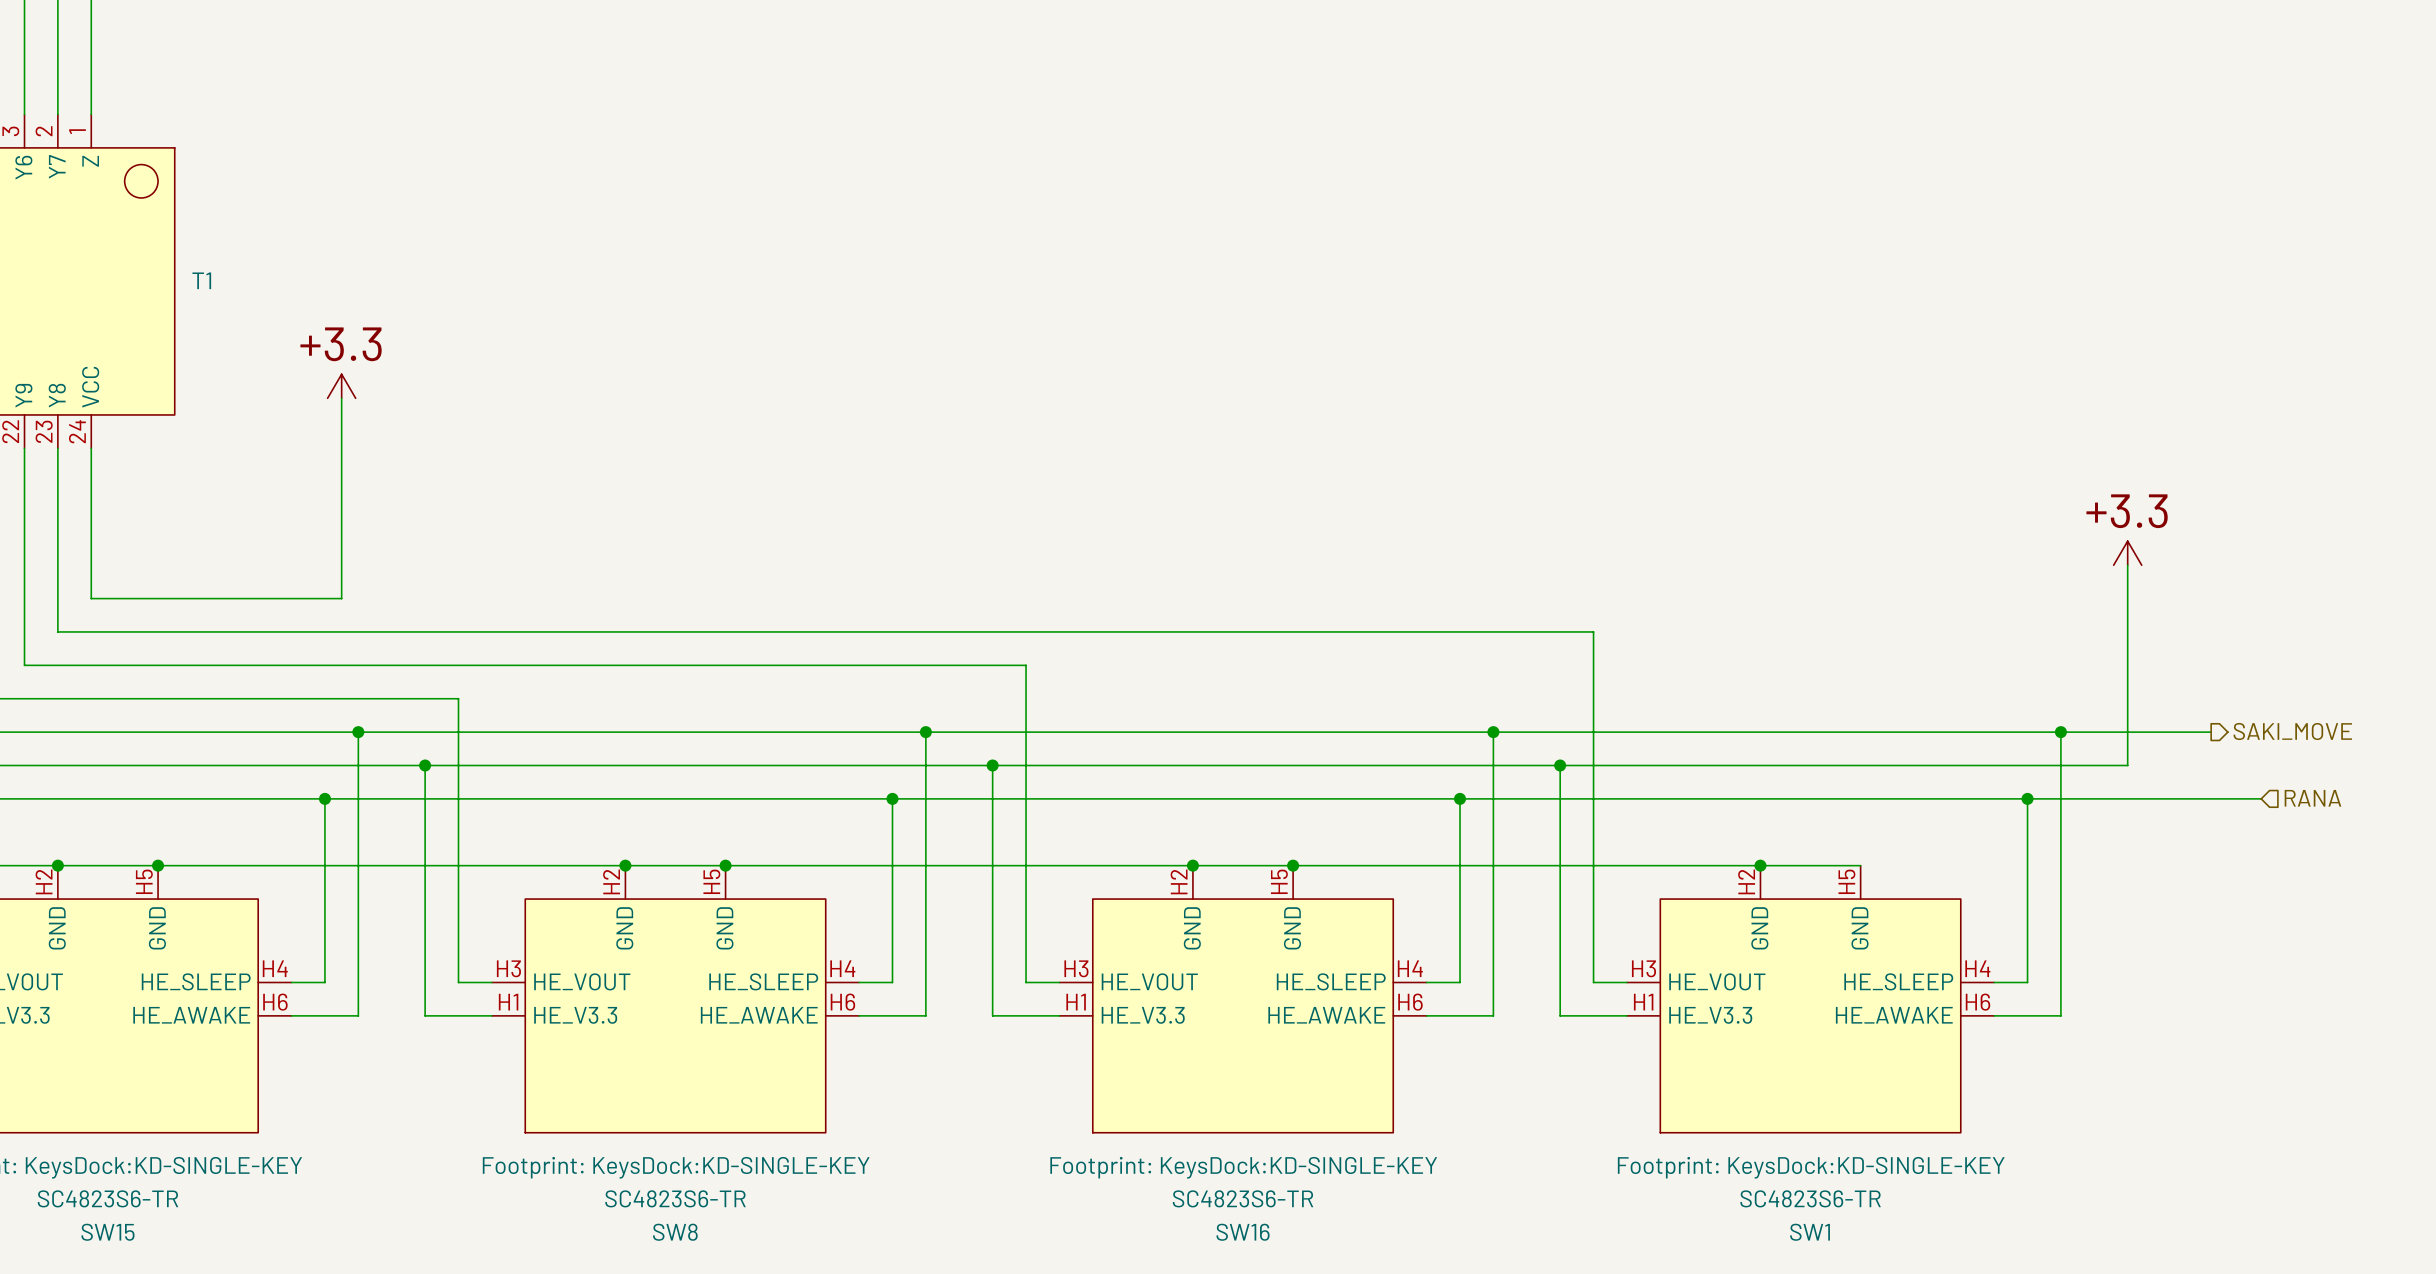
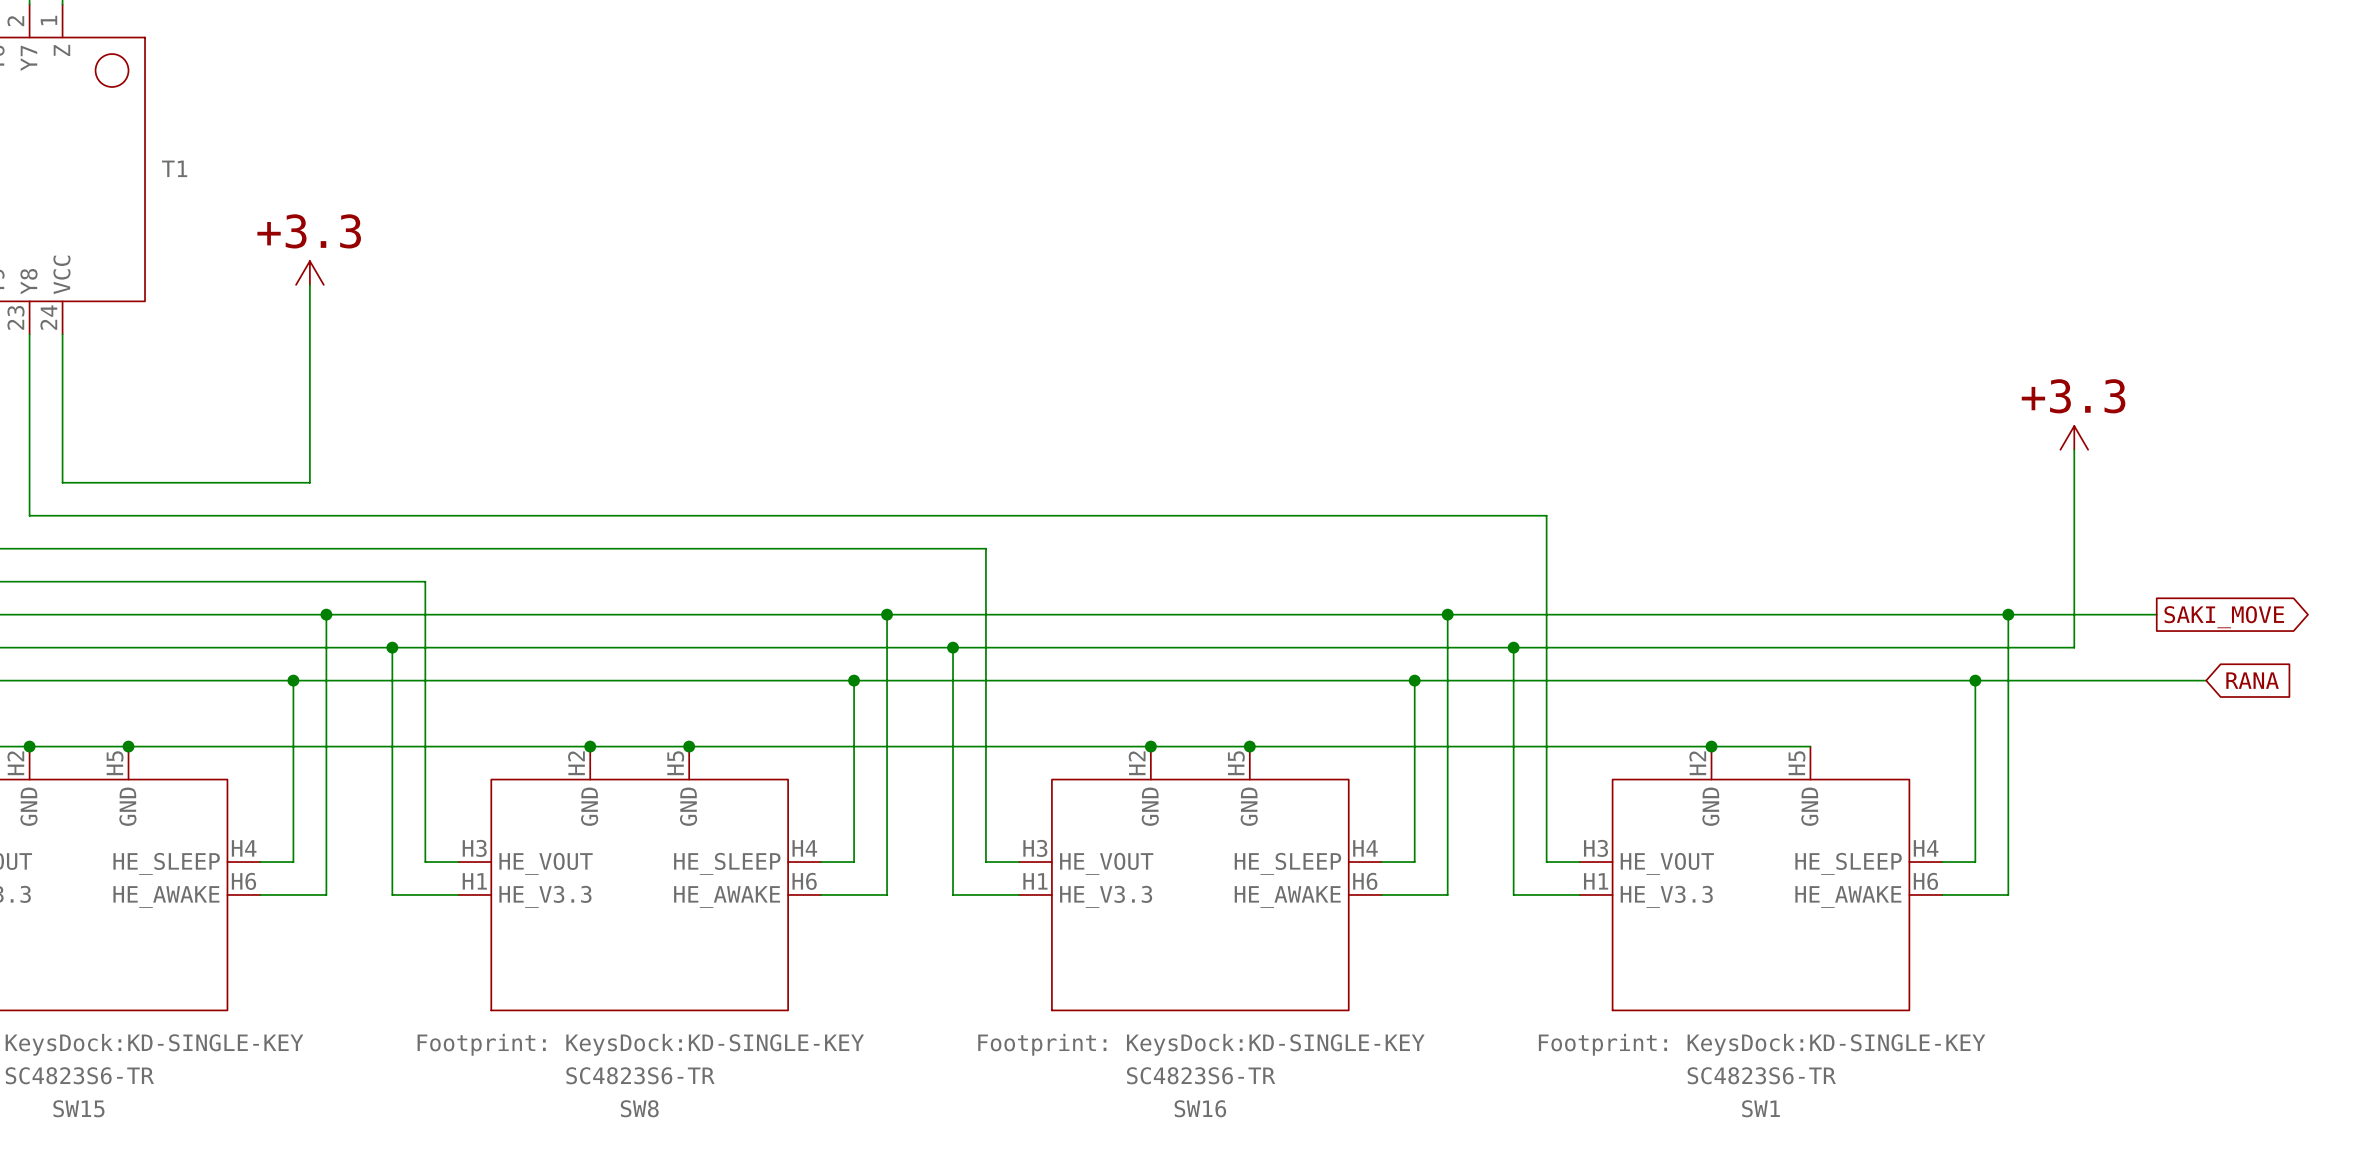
hierarchical label: SAKI_MOVE (2292, 731) -> none
global label: none -> SAKI_MOVE (2224, 617)
global label: none -> RANA (2252, 680)
hierarchical label: RANA (2312, 798) -> none

